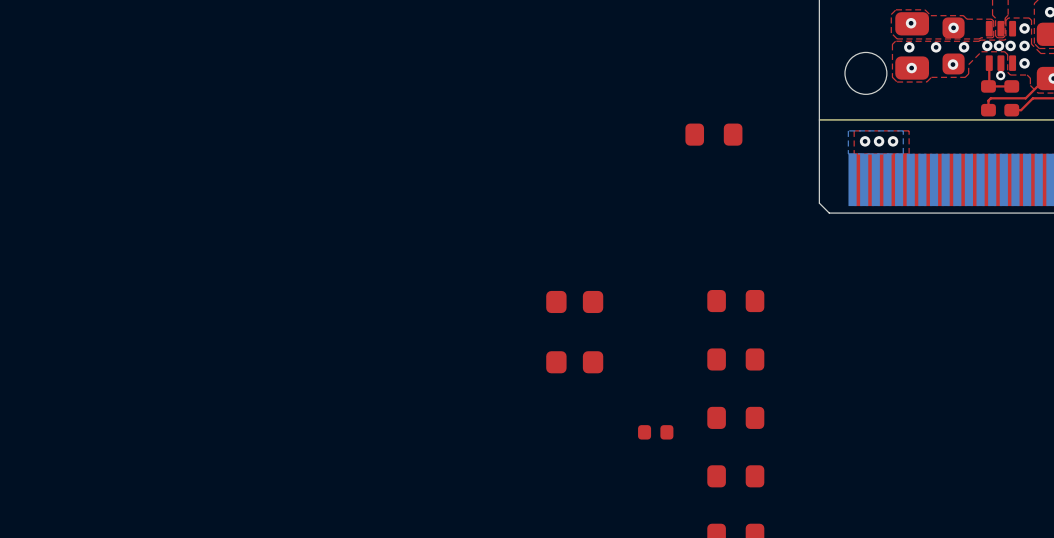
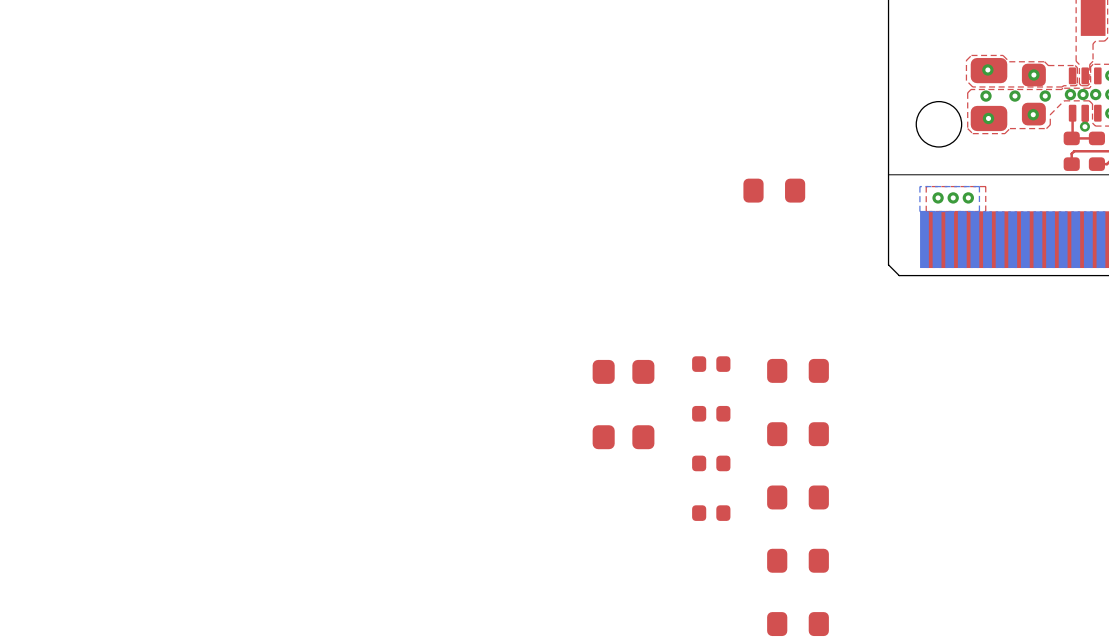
part: none -> (711, 364)
part: none -> (711, 413)
part: none -> (711, 463)

